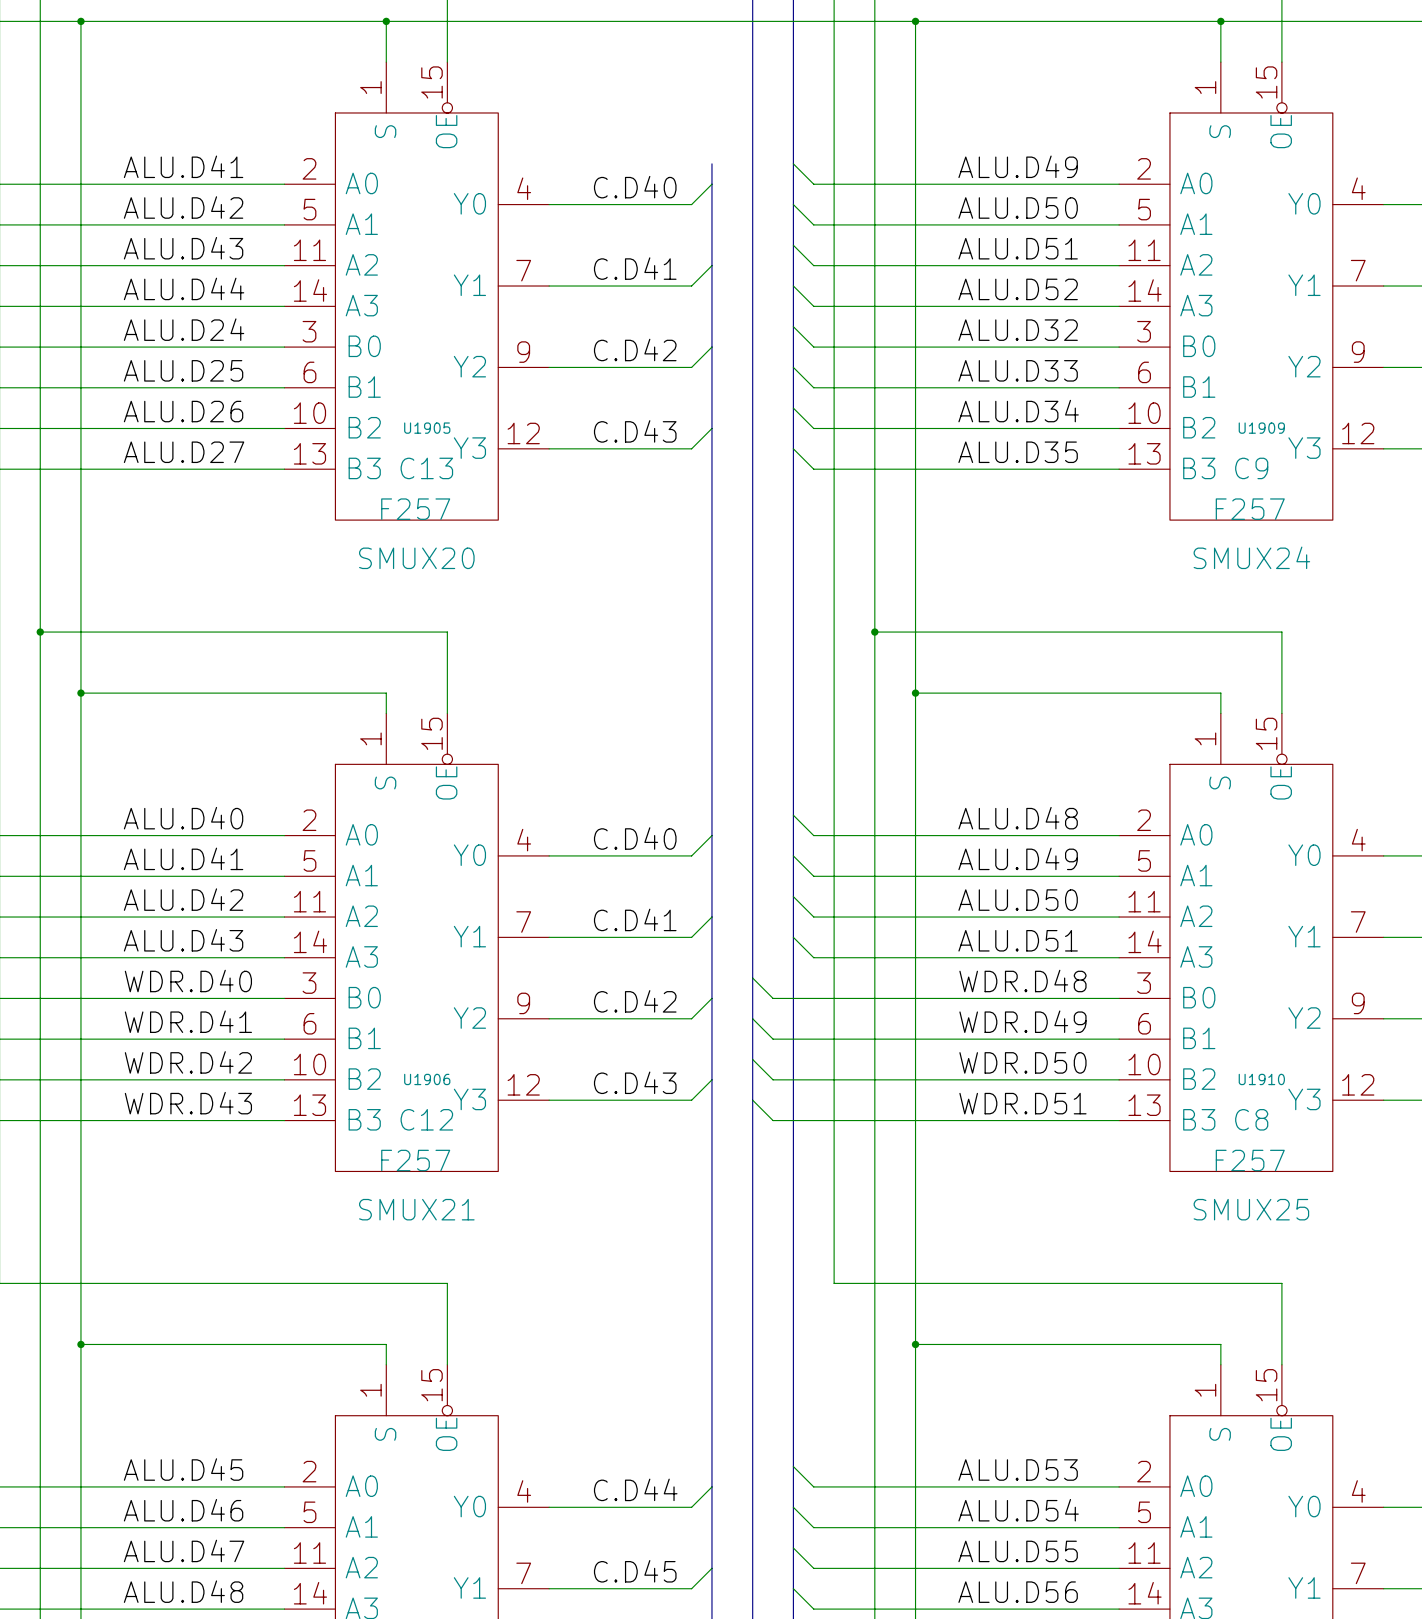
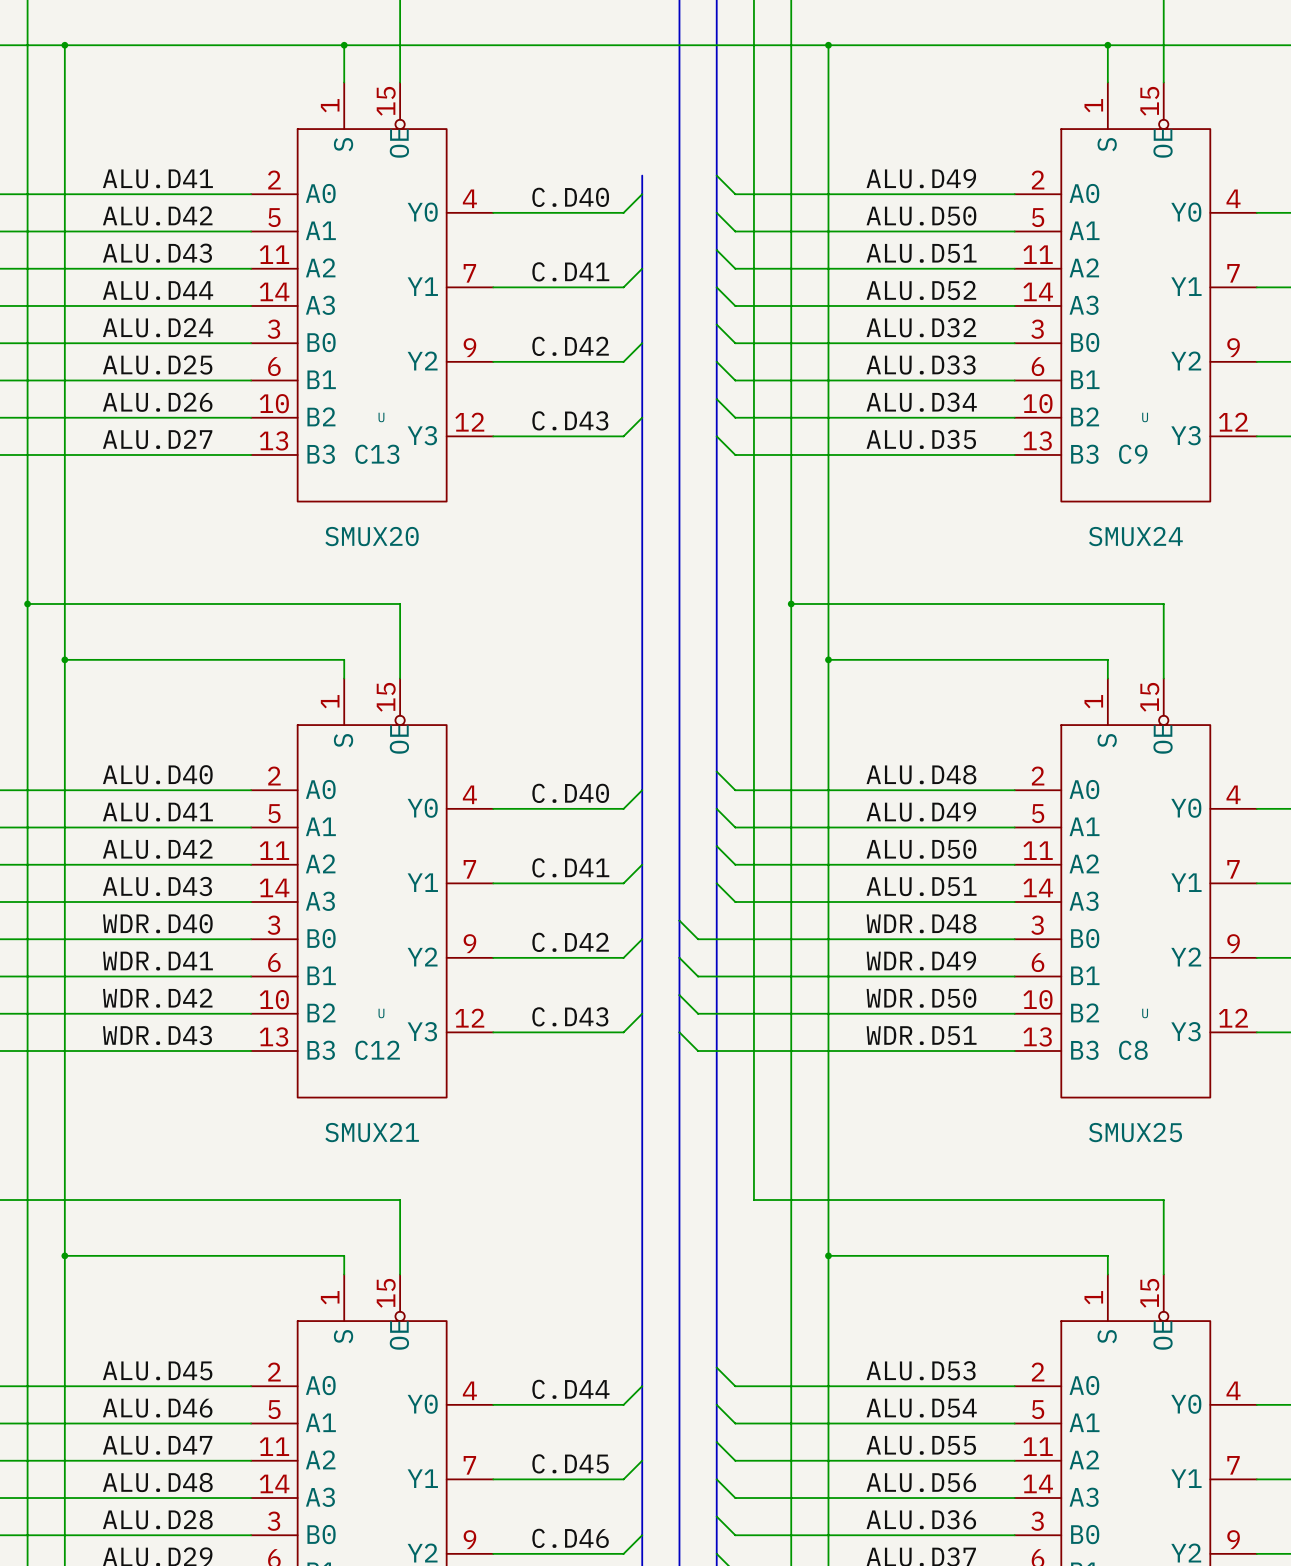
U1905 name: U1905 (427, 428) -> U (381, 417)
U1909 name: U1909 (1261, 428) -> U (1145, 417)
U1905 value: F257 (415, 509) -> none
U1909 value: F257 (1250, 509) -> none
U1906 name: U1906 (427, 1079) -> U (381, 1013)
U1910 name: U1910 (1261, 1079) -> U (1145, 1013)
U1906 value: F257 (415, 1160) -> none
U1910 value: F257 (1250, 1160) -> none

